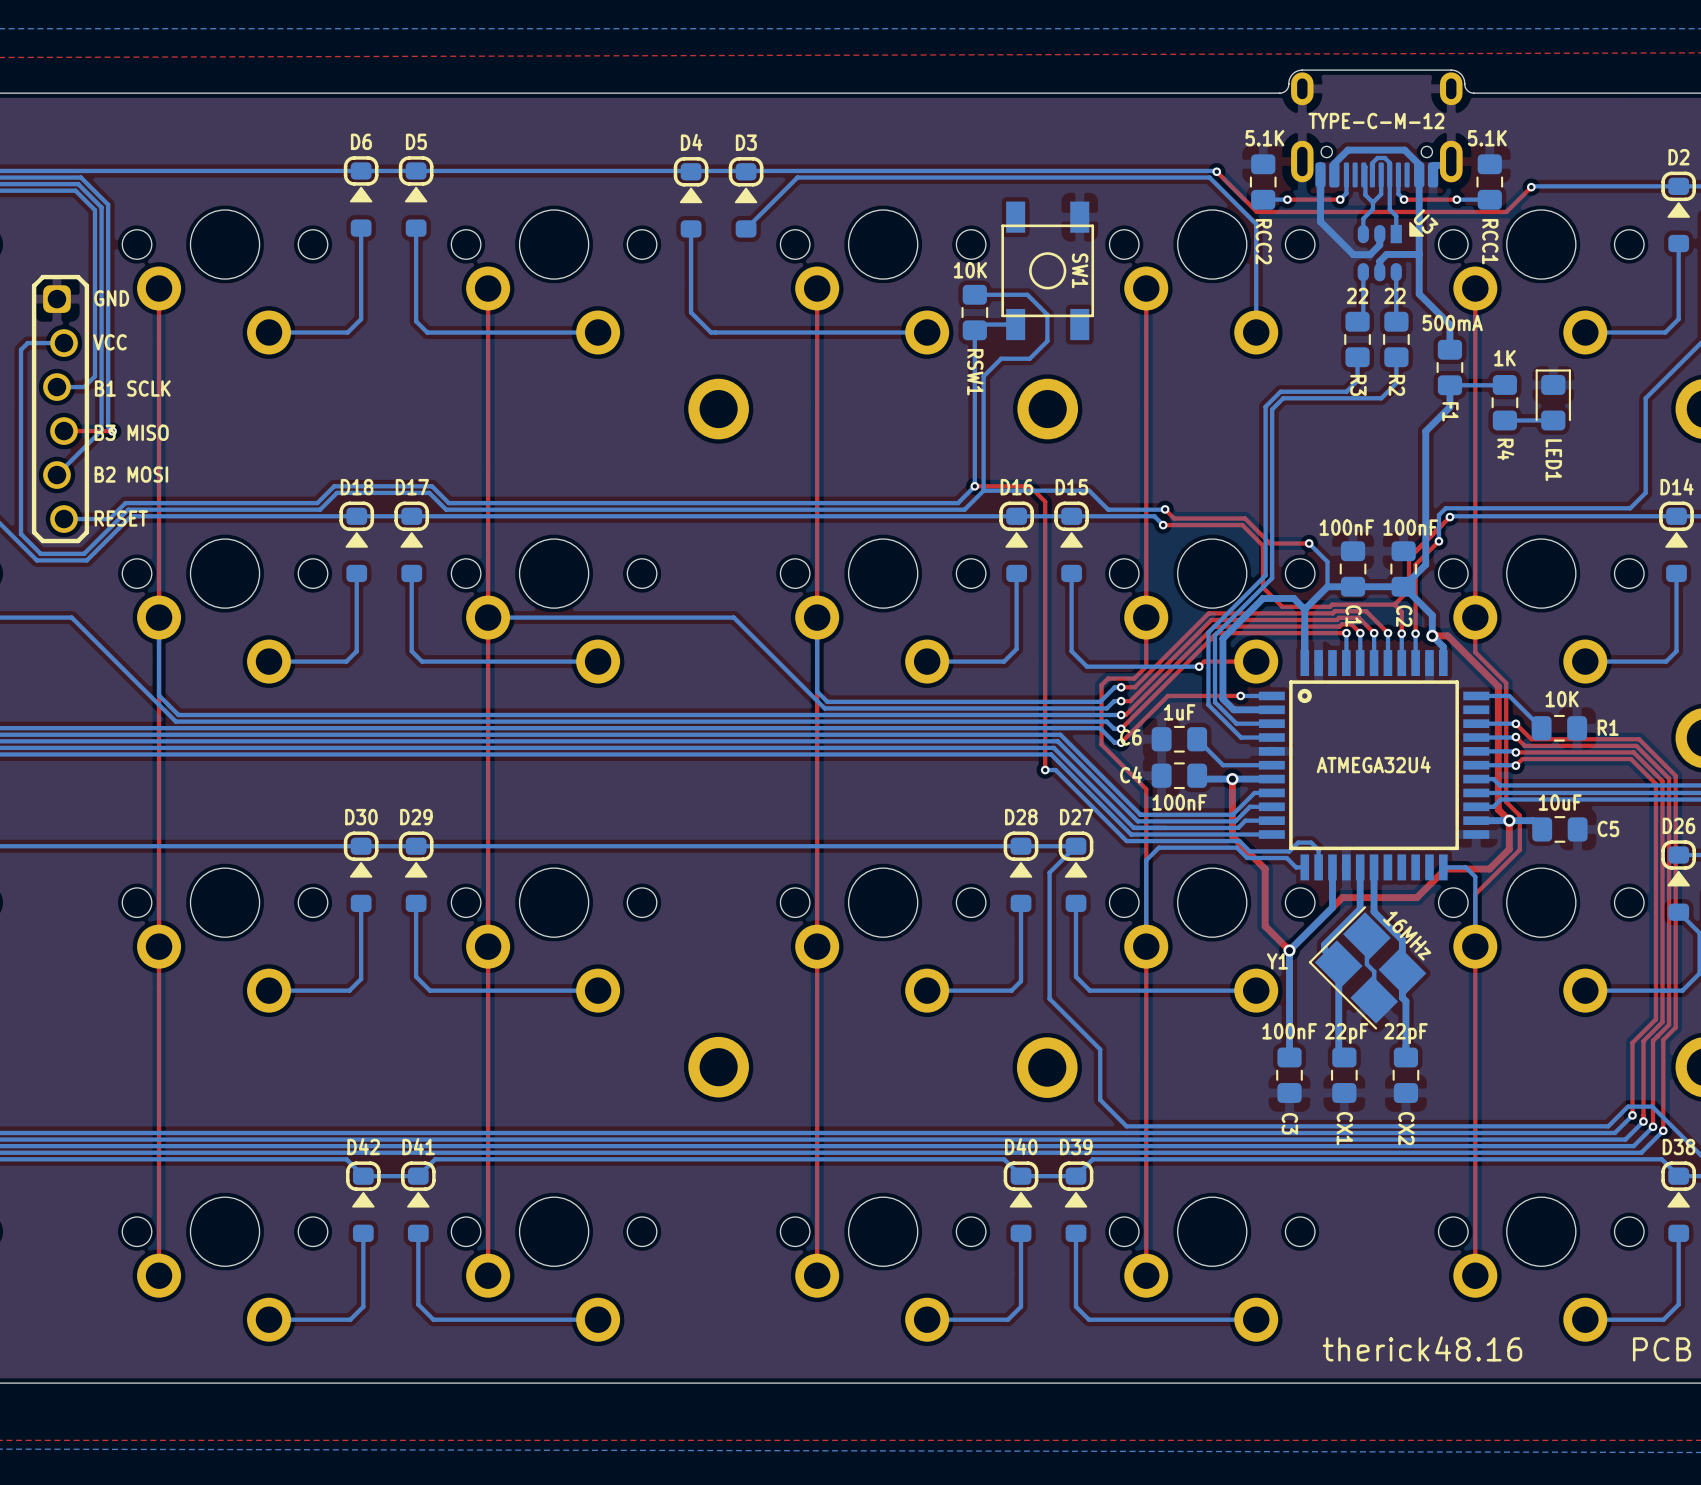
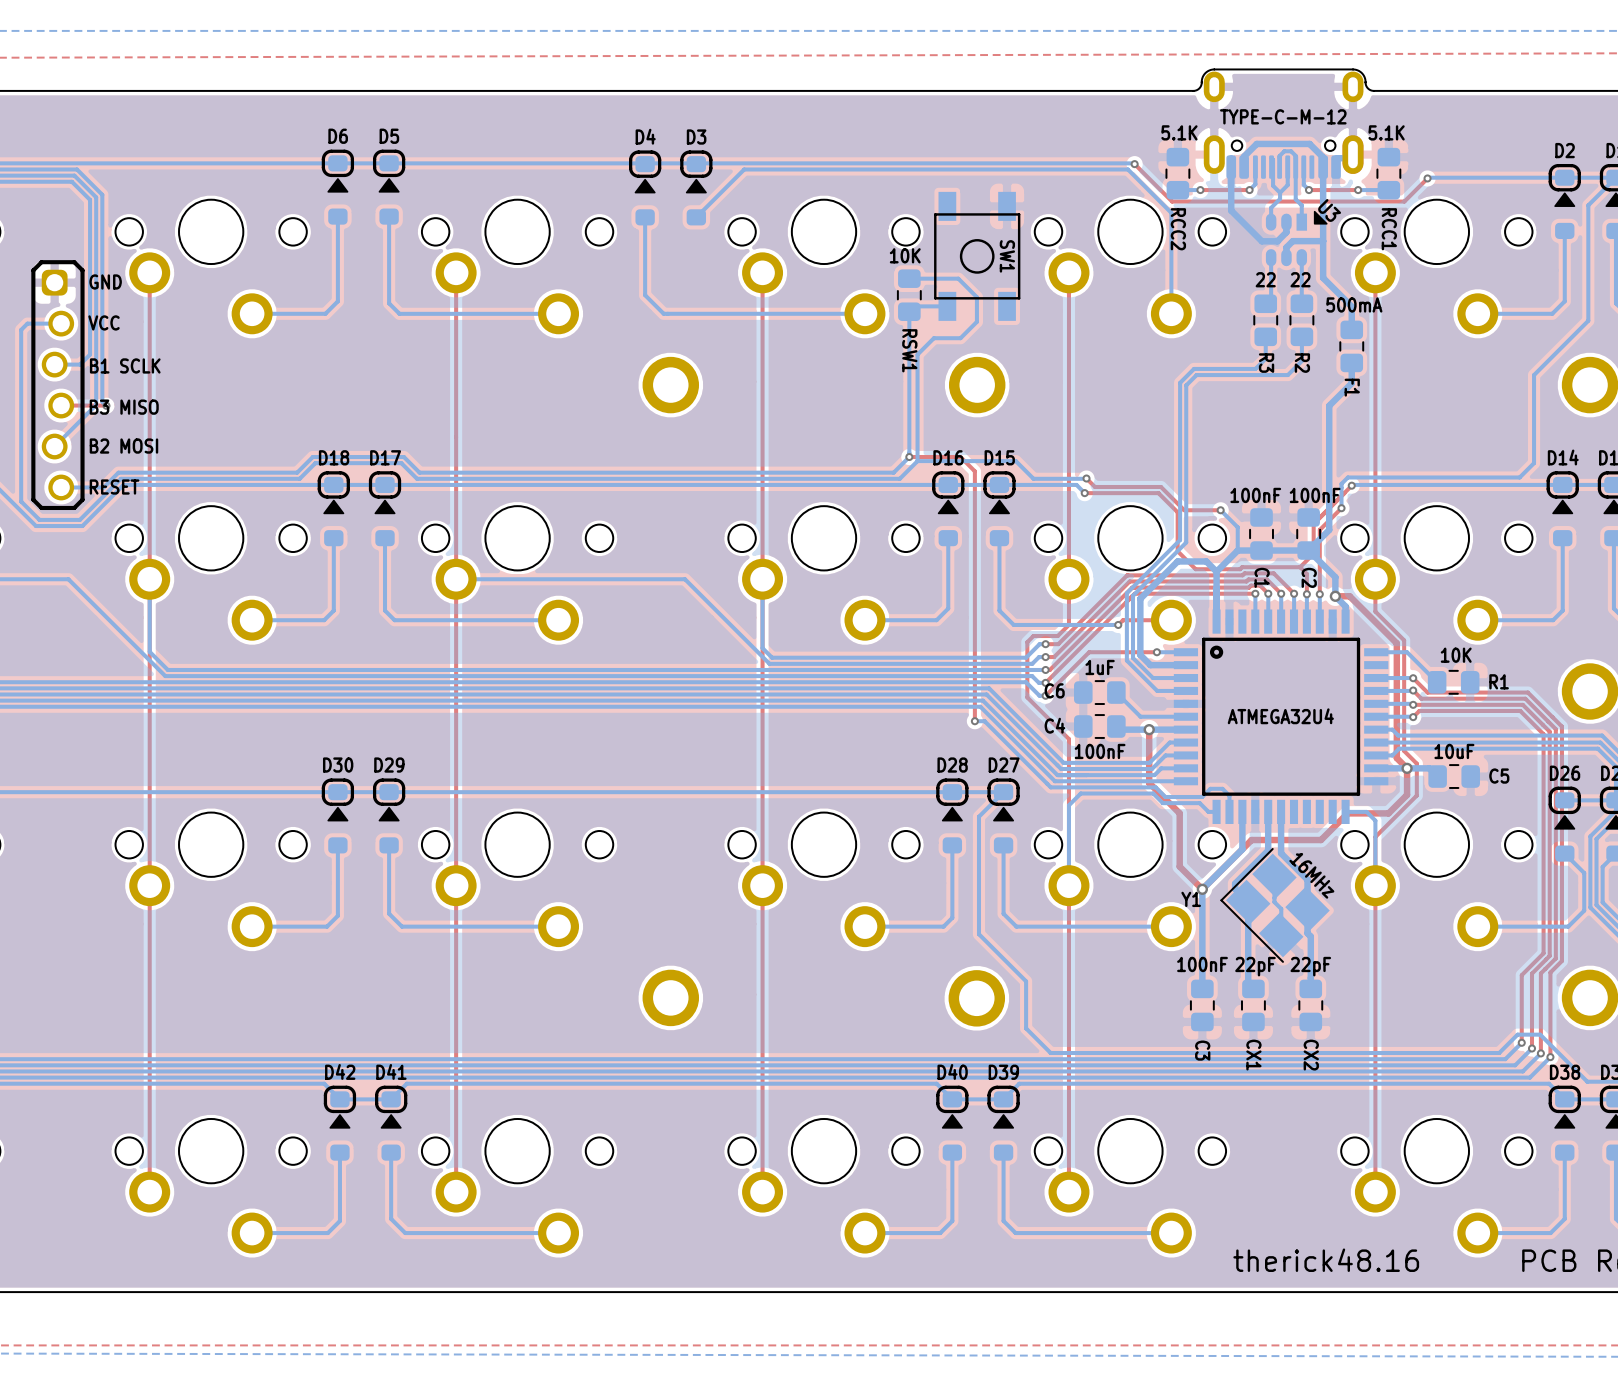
bottom track: (1504, 384) (1449, 385) -> none
LED1: (1553, 399) -> none
R4: 1K (1504, 402) -> none
bottom track: (1553, 420) (1504, 420) -> none

